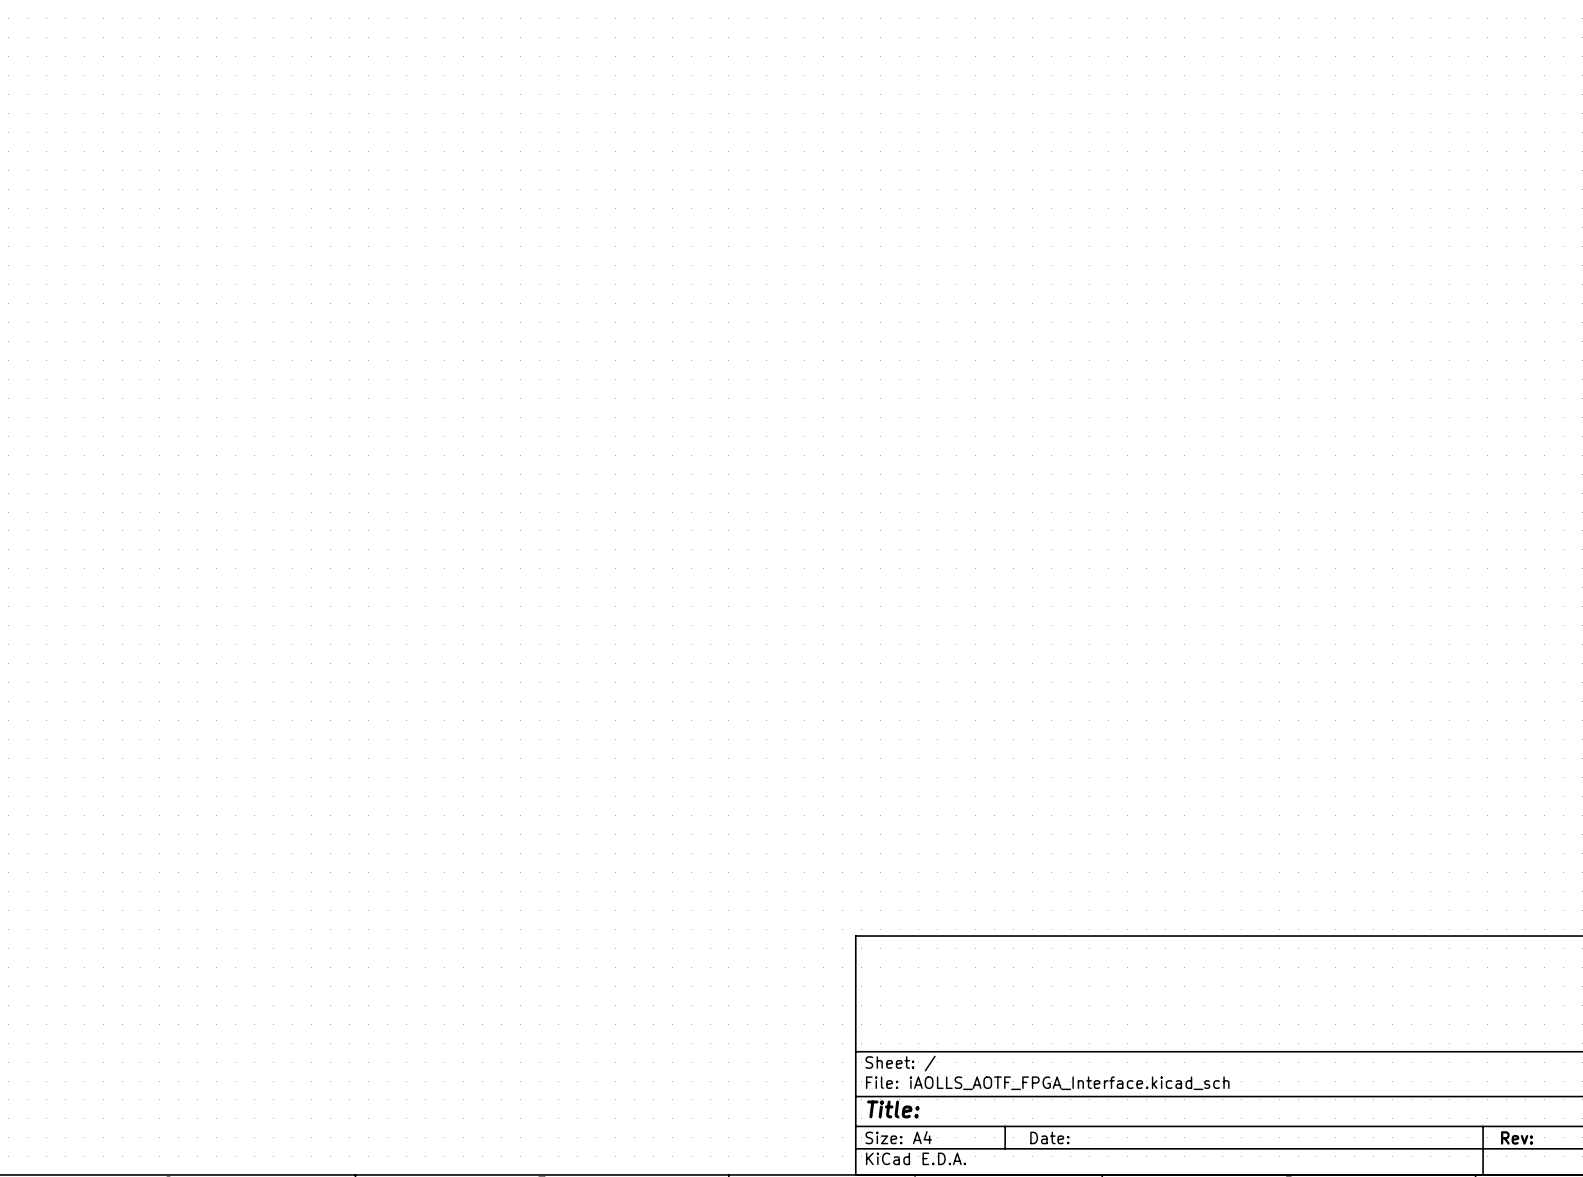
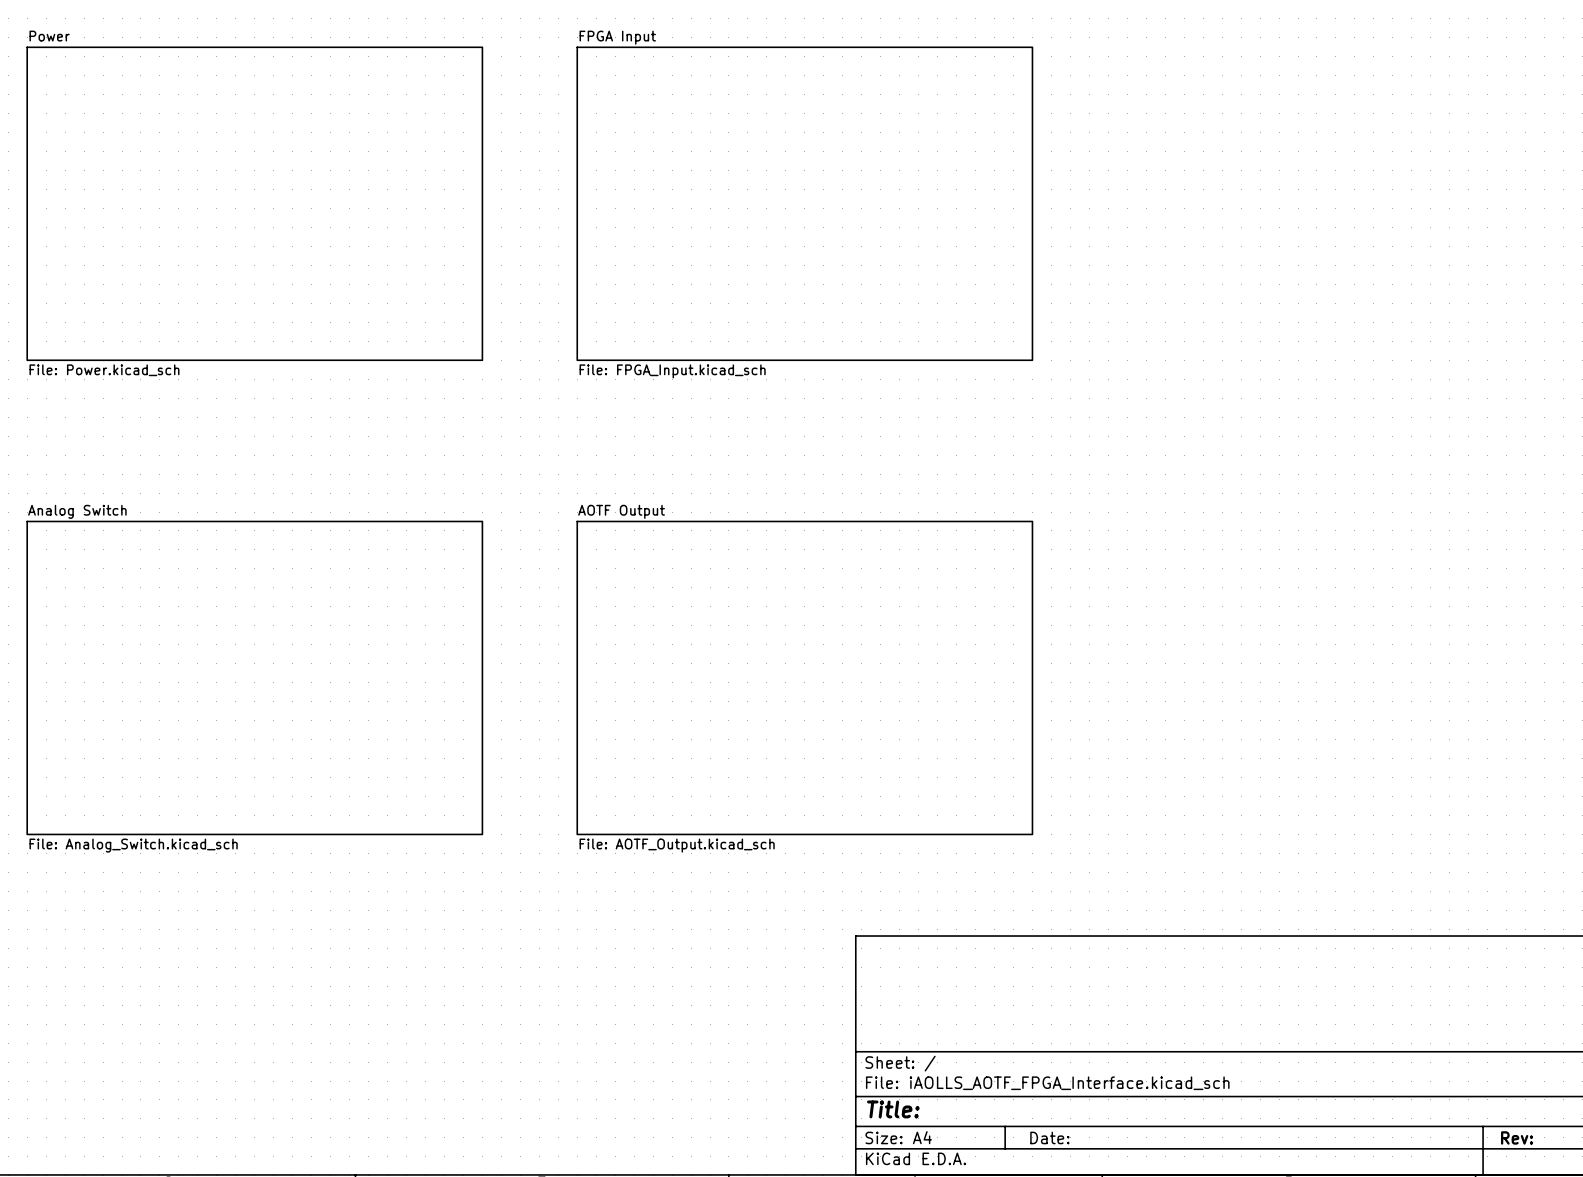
sheet Power: none -> File: Power.kicad_sch (254, 203)
sheet FPGA Input: none -> File: FPGA_Input.kicad_sch (804, 203)
sheet Analog Switch: none -> File: Analog_Switch.kicad_sch (254, 677)
sheet AOTF Output: none -> File: AOTF_Output.kicad_sch (804, 677)

